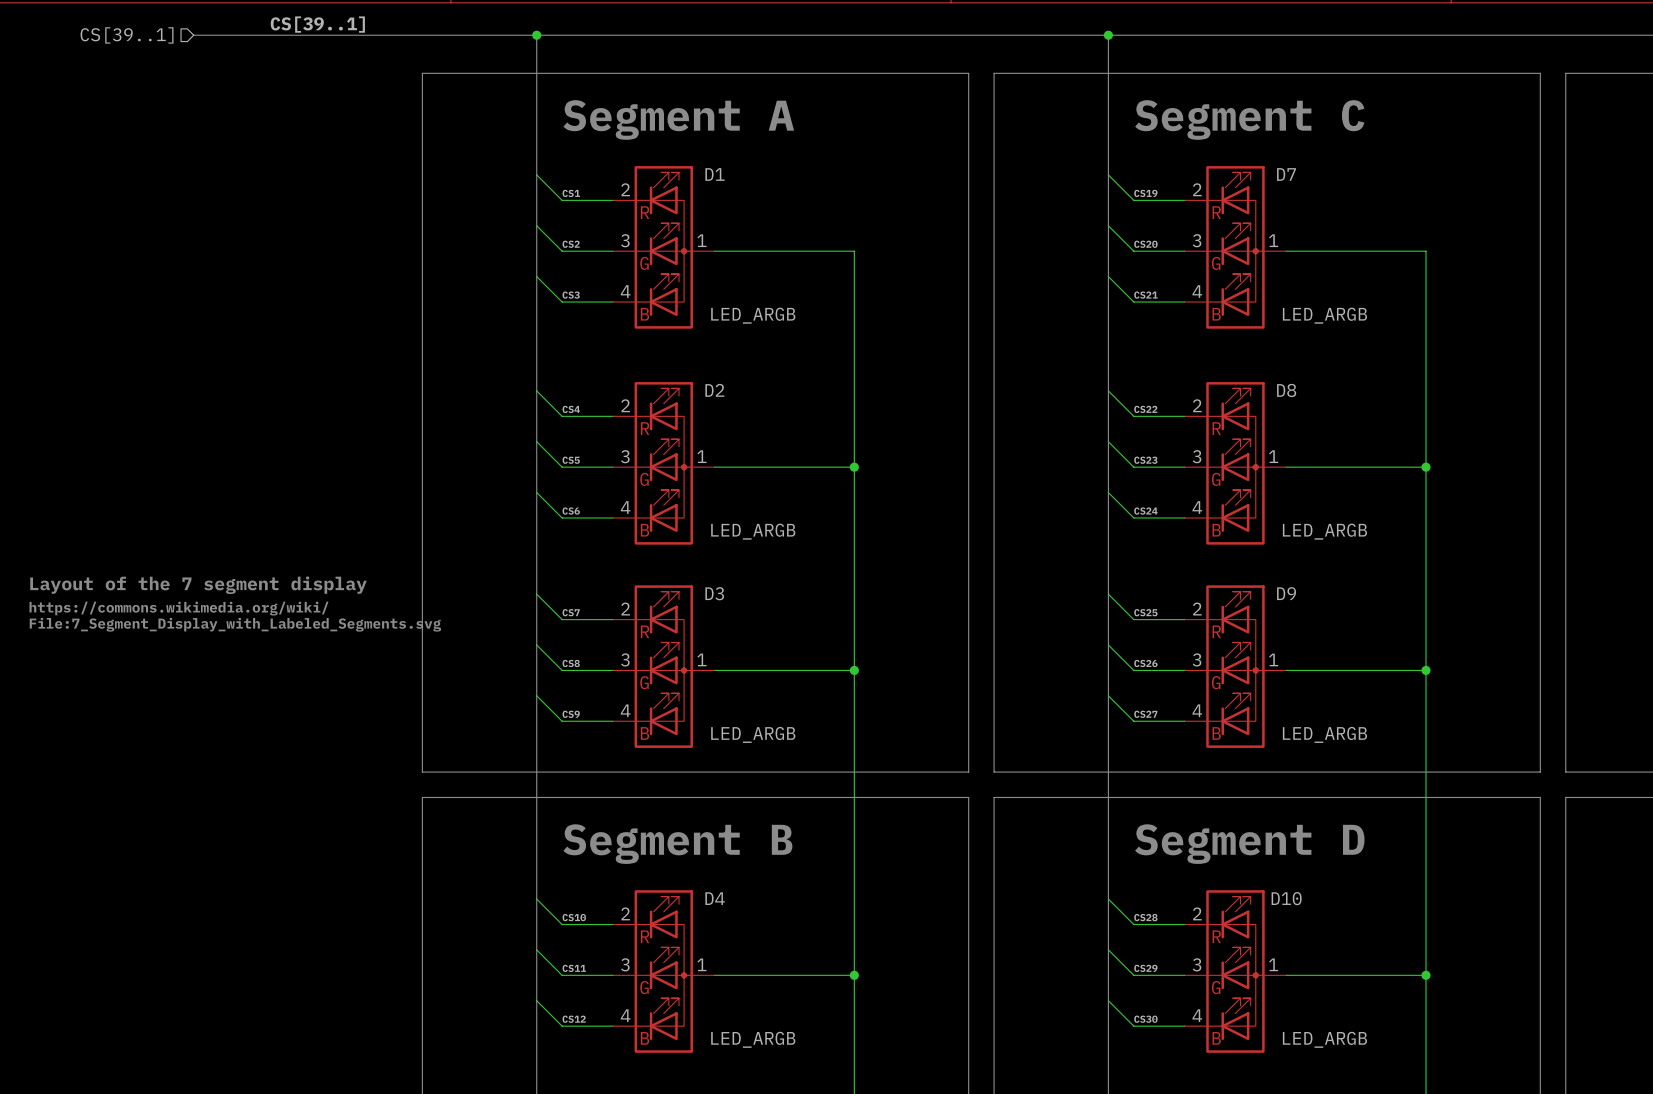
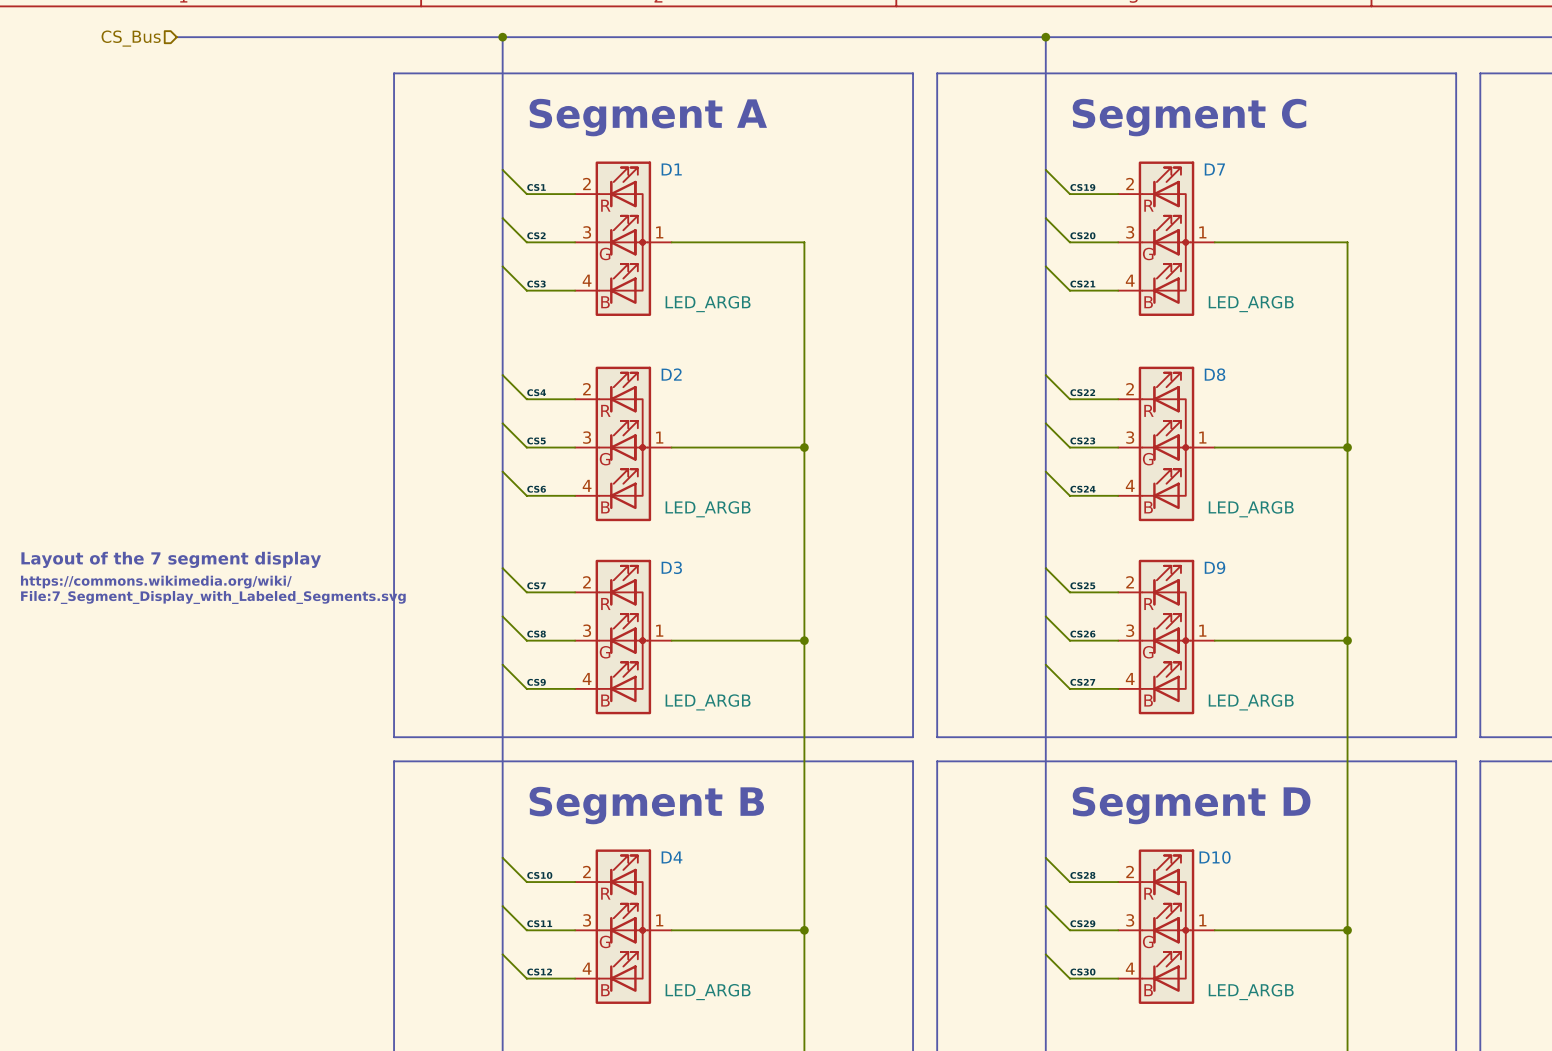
label: CS[39..1] (317, 24) -> none
hierarchical label: CS[39..1] (127, 35) -> CS_Bus (131, 38)

